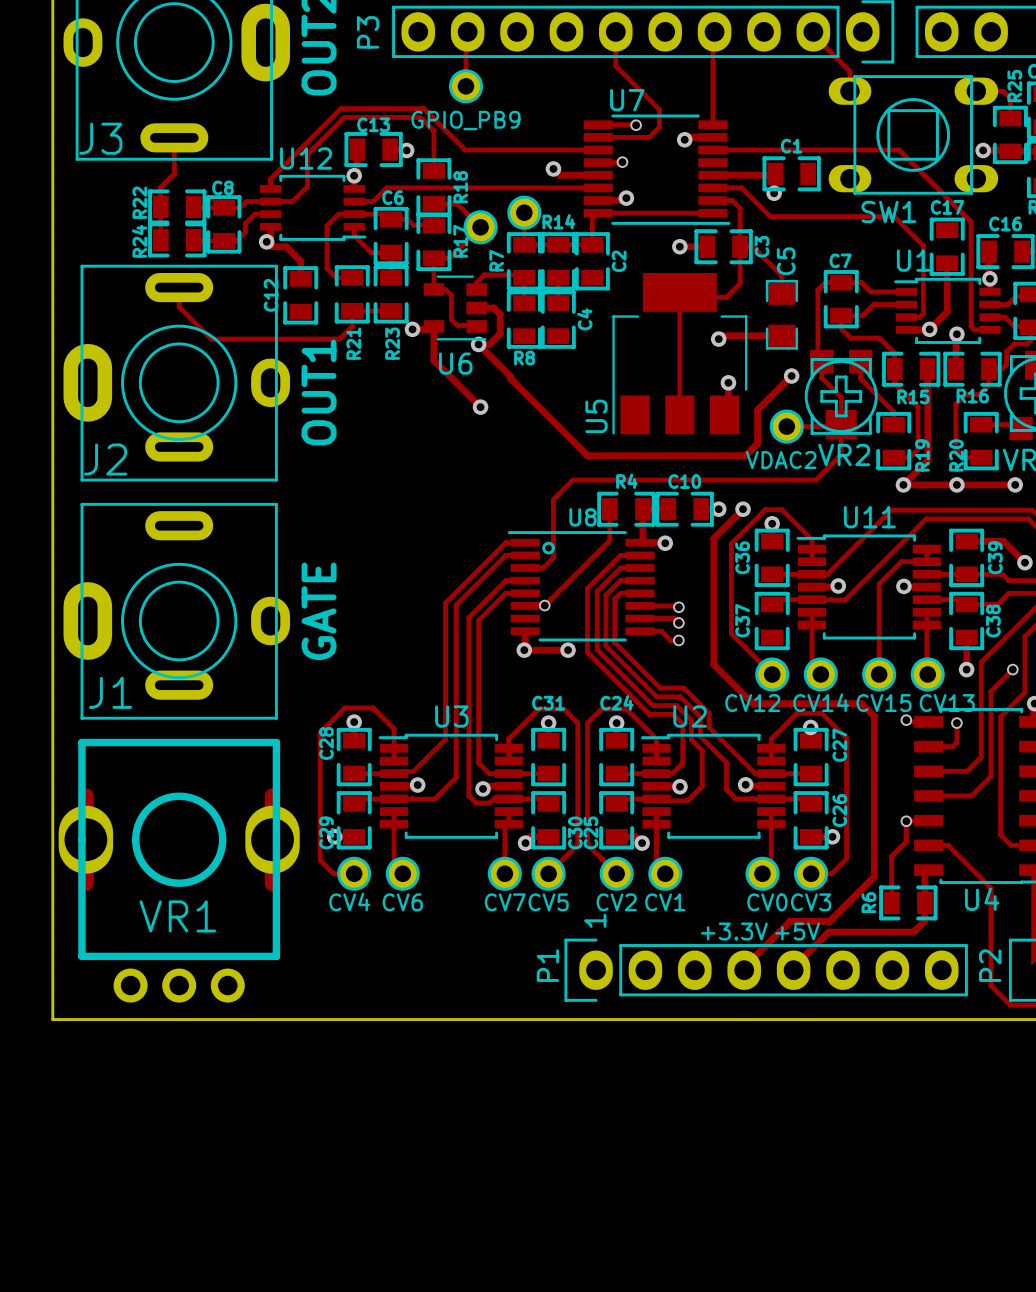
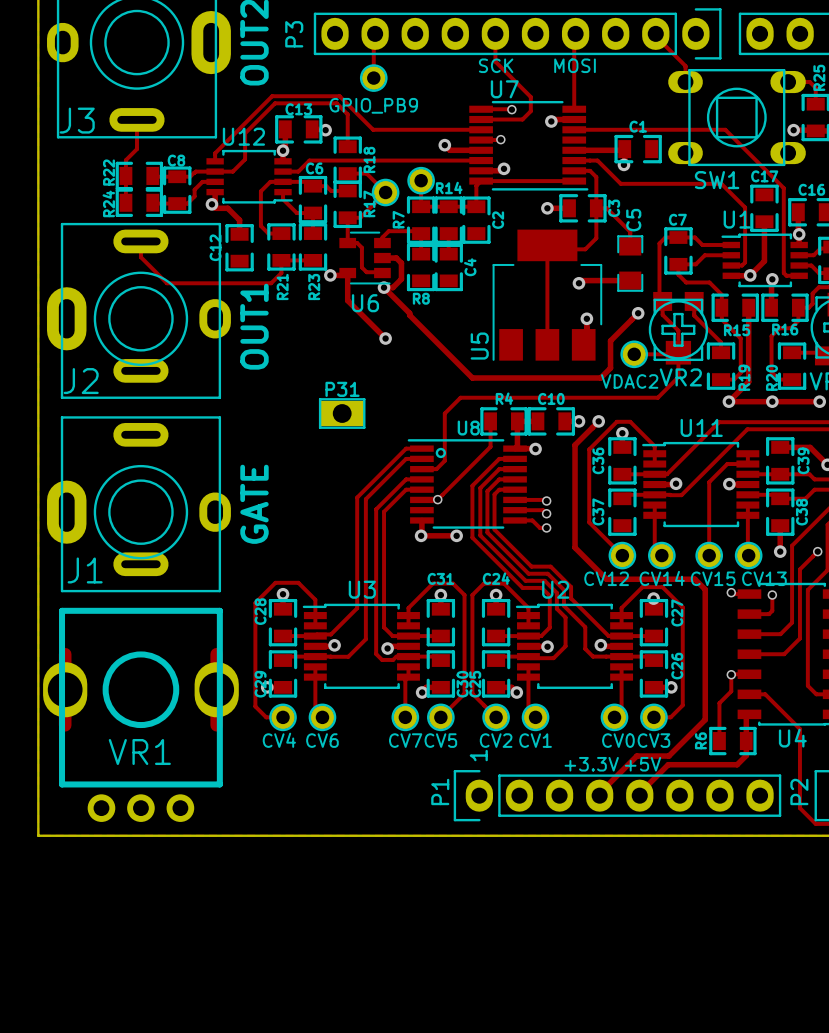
text: none -> SCK (496, 65)
text: none -> MOSI (575, 65)
P31: none -> (342, 413)

